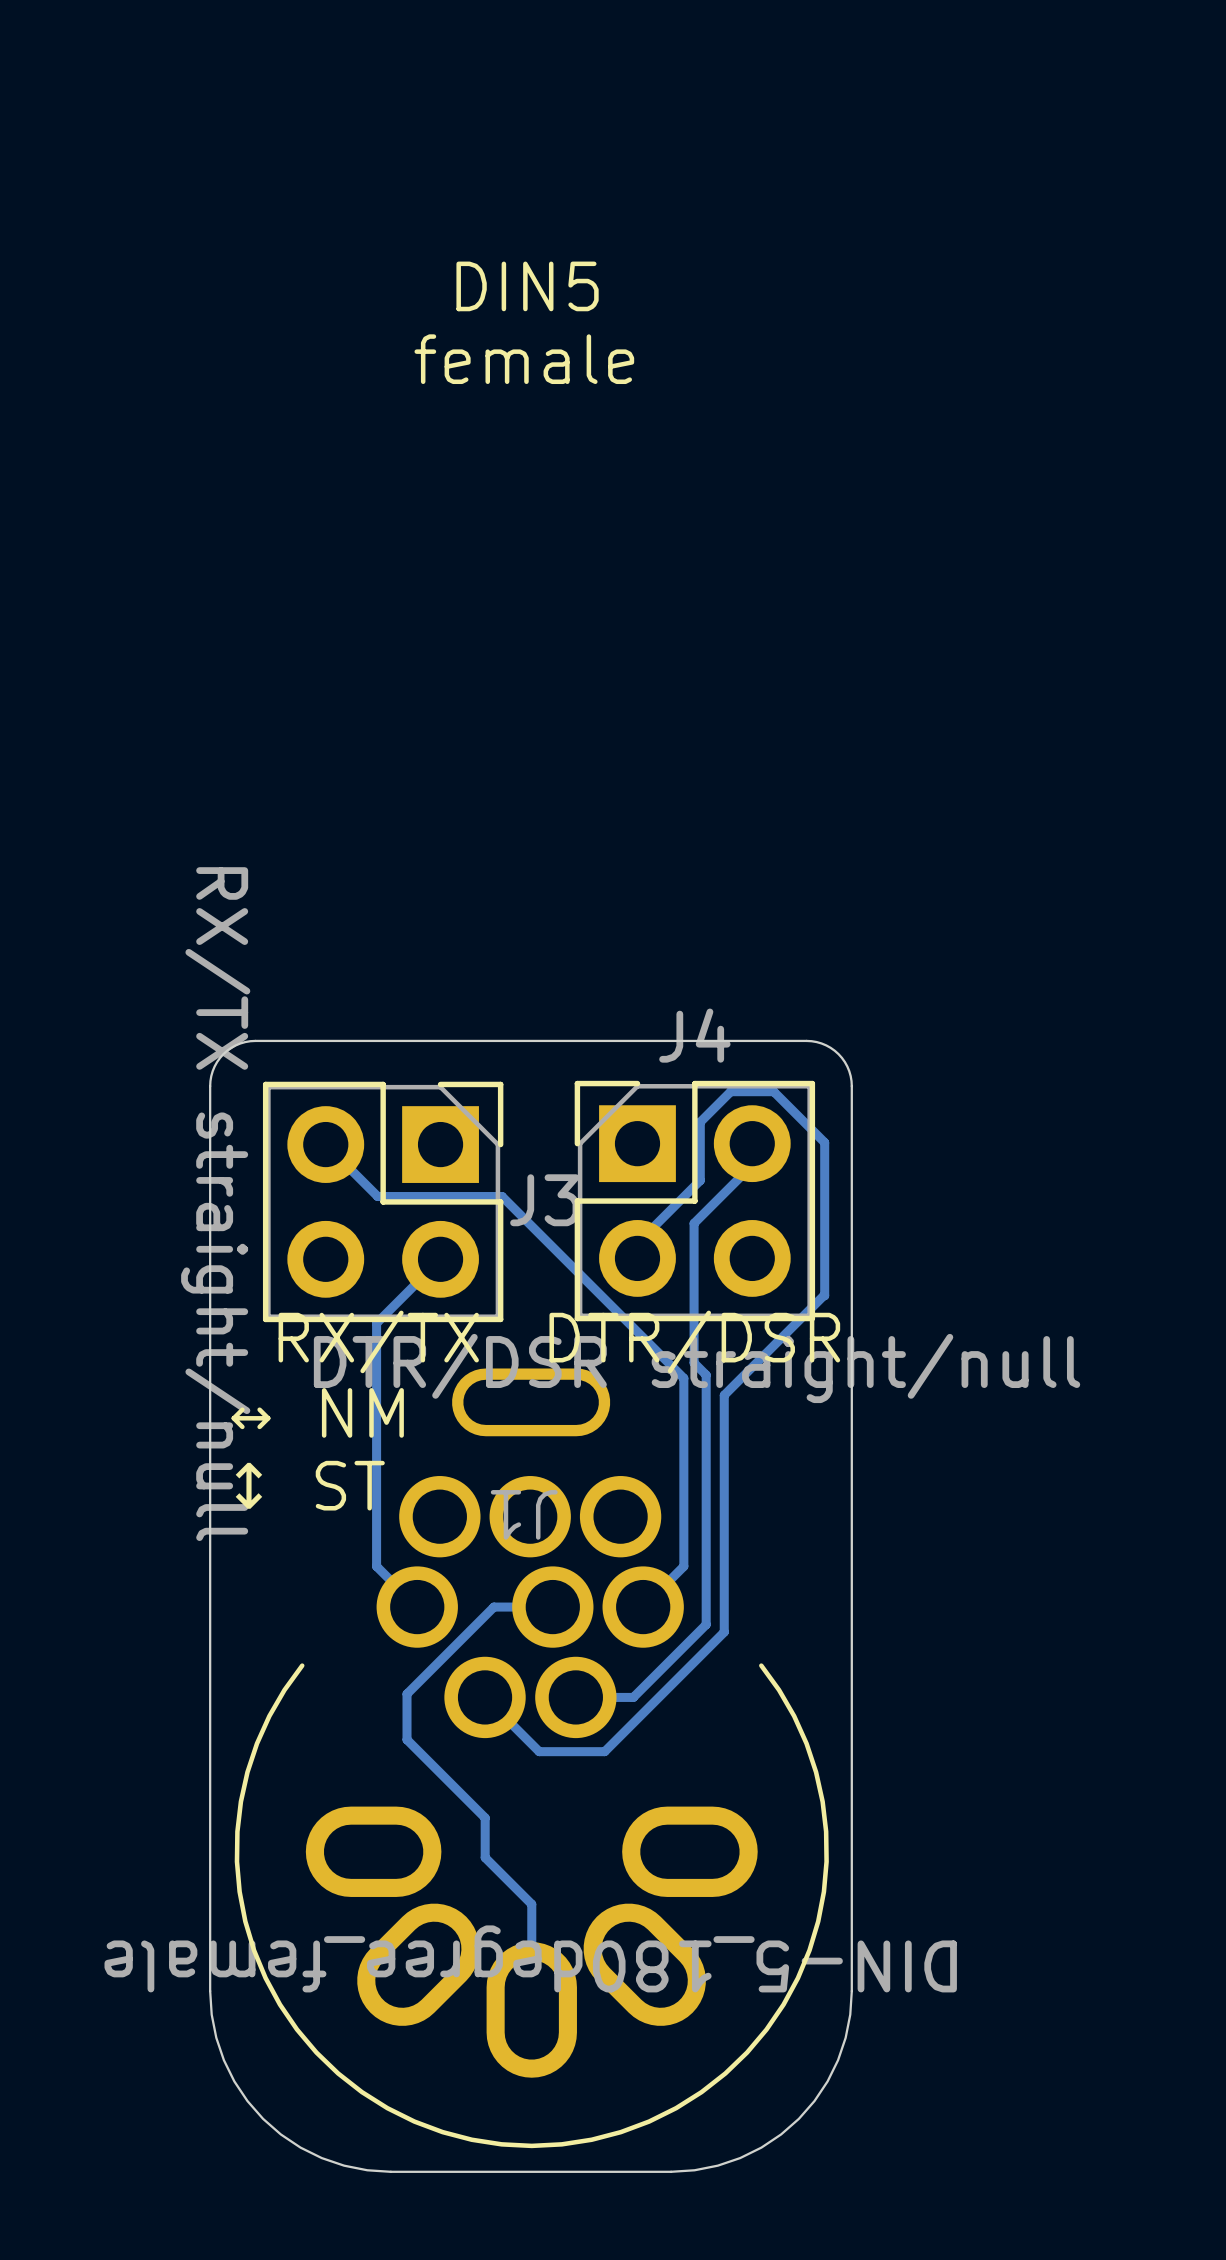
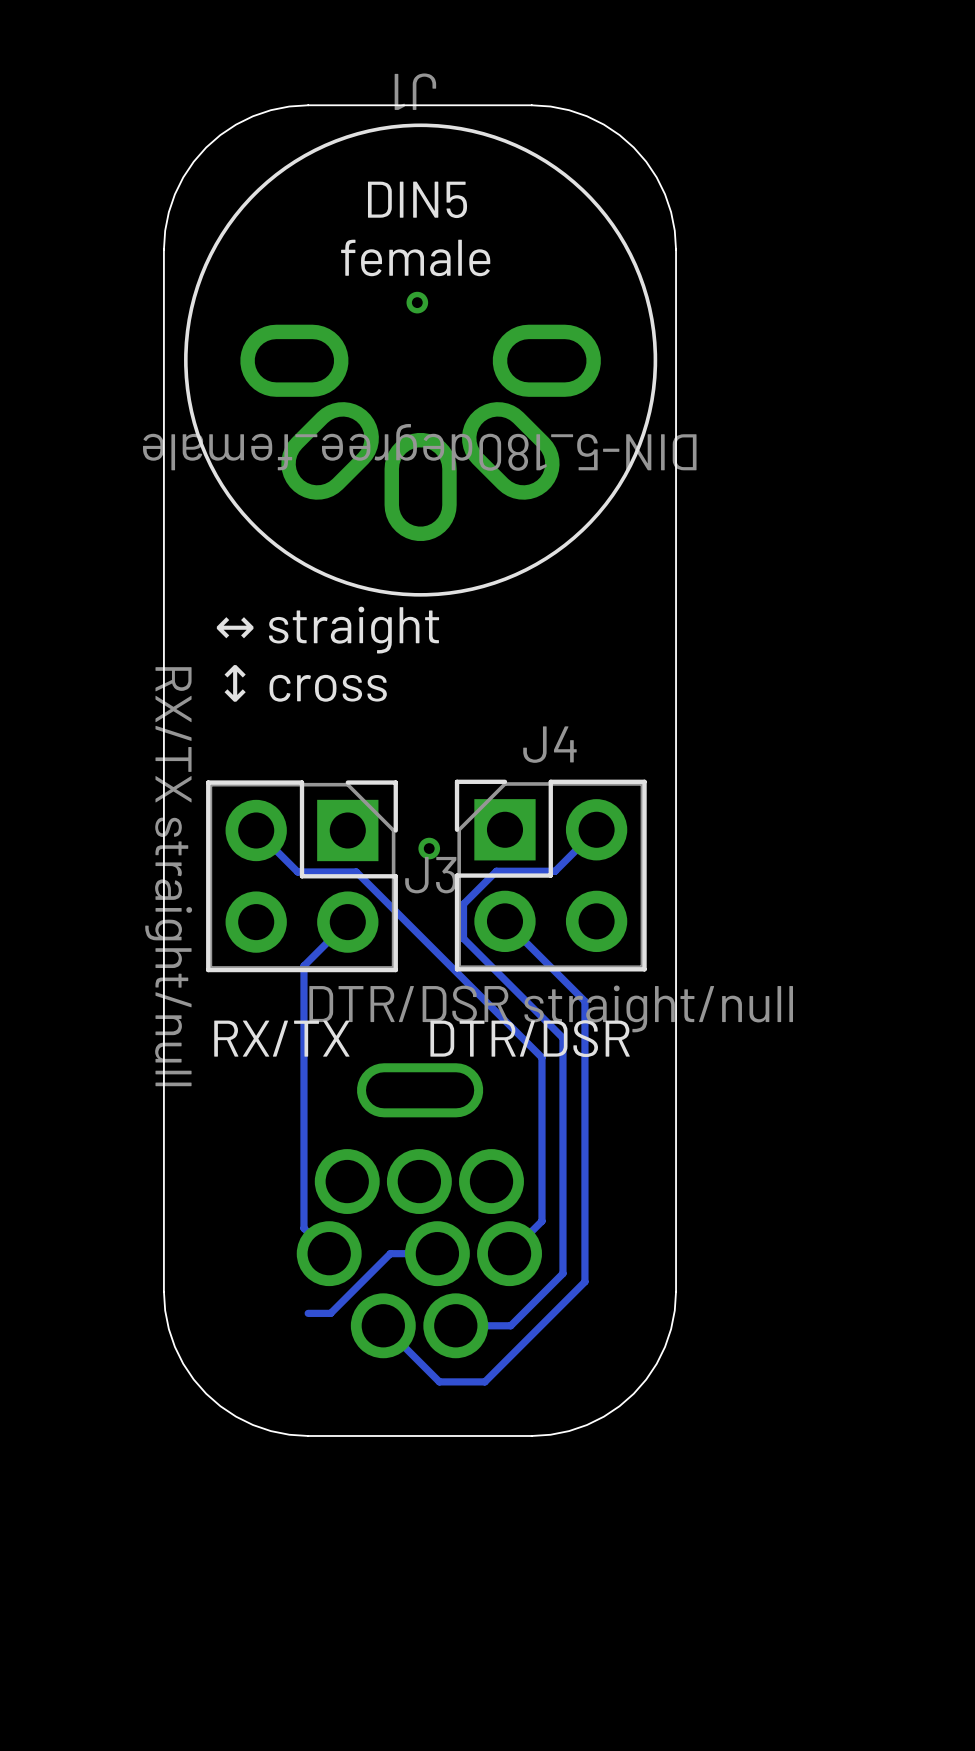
via: none -> (417, 302)
text: none -> ↔ straight (327, 630)
text: none -> ↕ cross (305, 683)
board edge: (851, 1086) (847, 1066) (838, 1054) (826, 1045) (806, 1040) (250, 1041) (231, 1047) (220, 1057) (212, 1071) (210, 1086) -> (676, 837) (674, 230) (665, 194) (656, 177) (646, 161) (619, 135) (603, 124) (569, 110) (531, 105) (308, 105) (270, 110) (252, 116) (220, 135) (206, 147) (183, 177) (168, 212) (163, 249) (163, 837)
via: none -> (429, 848)
track: (752, 1143) (752, 1165) (694, 1223) (694, 1362) (706, 1375) (706, 1624) (633, 1697) -> (596, 829) (555, 871) (496, 871) (463, 904) (463, 938) (562, 1038) (562, 1273) (510, 1325) (501, 1325)
track: (325, 1144) (377, 1196) (502, 1196) (683, 1378) -> (256, 830) (297, 871) (356, 871) (541, 1057) (541, 1071)
J3 position: (383, 1201) -> (302, 876)
J4 position: (694, 1201) -> (550, 875)
track: (637, 1258) (637, 1243) (700, 1180) (700, 1122) (730, 1091) (773, 1091) (824, 1142) (824, 1295) (724, 1395) (724, 1632) (604, 1751) (539, 1751) -> (504, 921) (584, 1001) (584, 1281) (484, 1381) (439, 1381) (426, 1369)
track: (440, 1259) (376, 1323) (376, 1566) (385, 1575) -> (347, 922) (303, 965) (303, 1228)
text: ↔ NM (317, 1412) -> none
text: ↕ ST (309, 1485) -> none
board edge: (851, 1654) (851, 1991) (850, 2014) (845, 2037) (838, 2060) (827, 2081) (814, 2101) (798, 2118) (781, 2134) (761, 2147) (740, 2158) (717, 2165) (694, 2170) (671, 2171) (367, 2170) (344, 2165) (321, 2158) (300, 2147) (280, 2134) (263, 2118) (247, 2101) (234, 2081) (223, 2060) (216, 2037) (211, 2014) (210, 1654) -> (676, 1291) (674, 1310) (665, 1346) (646, 1379) (633, 1393) (603, 1416) (586, 1425) (569, 1431) (531, 1435) (308, 1435) (270, 1431) (252, 1425) (220, 1406) (193, 1379) (174, 1346) (168, 1329) (163, 1291)
J1 footprint: [234, 1663, 829, 2149] -> [184, 123, 658, 597]
track: (419, 1681) (407, 1693) (407, 1739) (485, 1817) (485, 1857) (531, 1904) (531, 2009) -> (330, 1313) (308, 1313)

